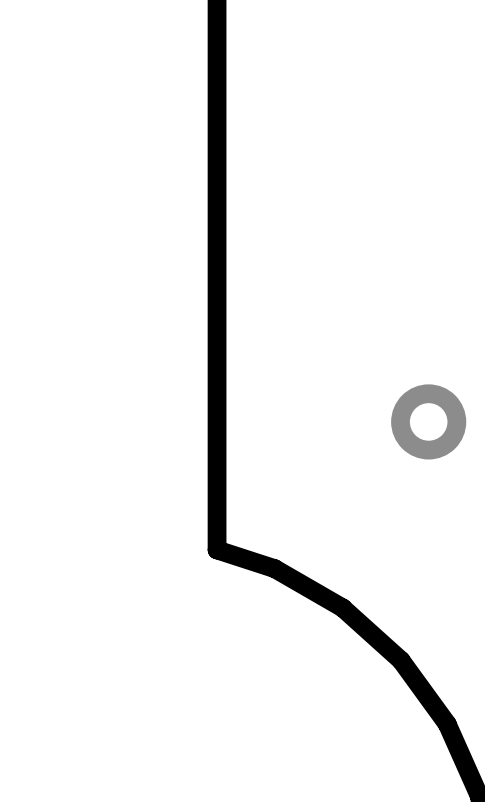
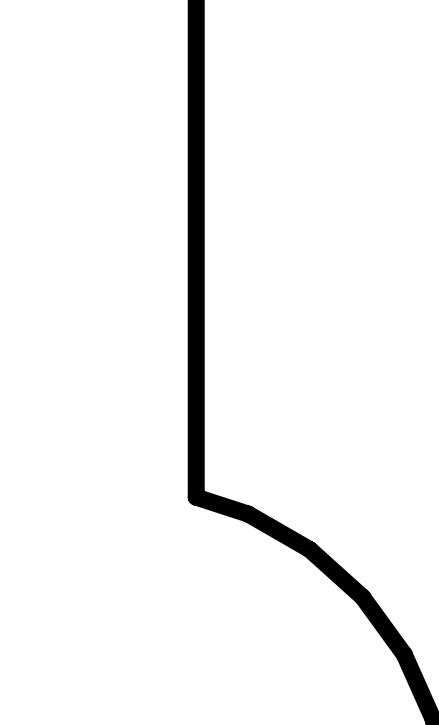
via: (428, 421) -> none

